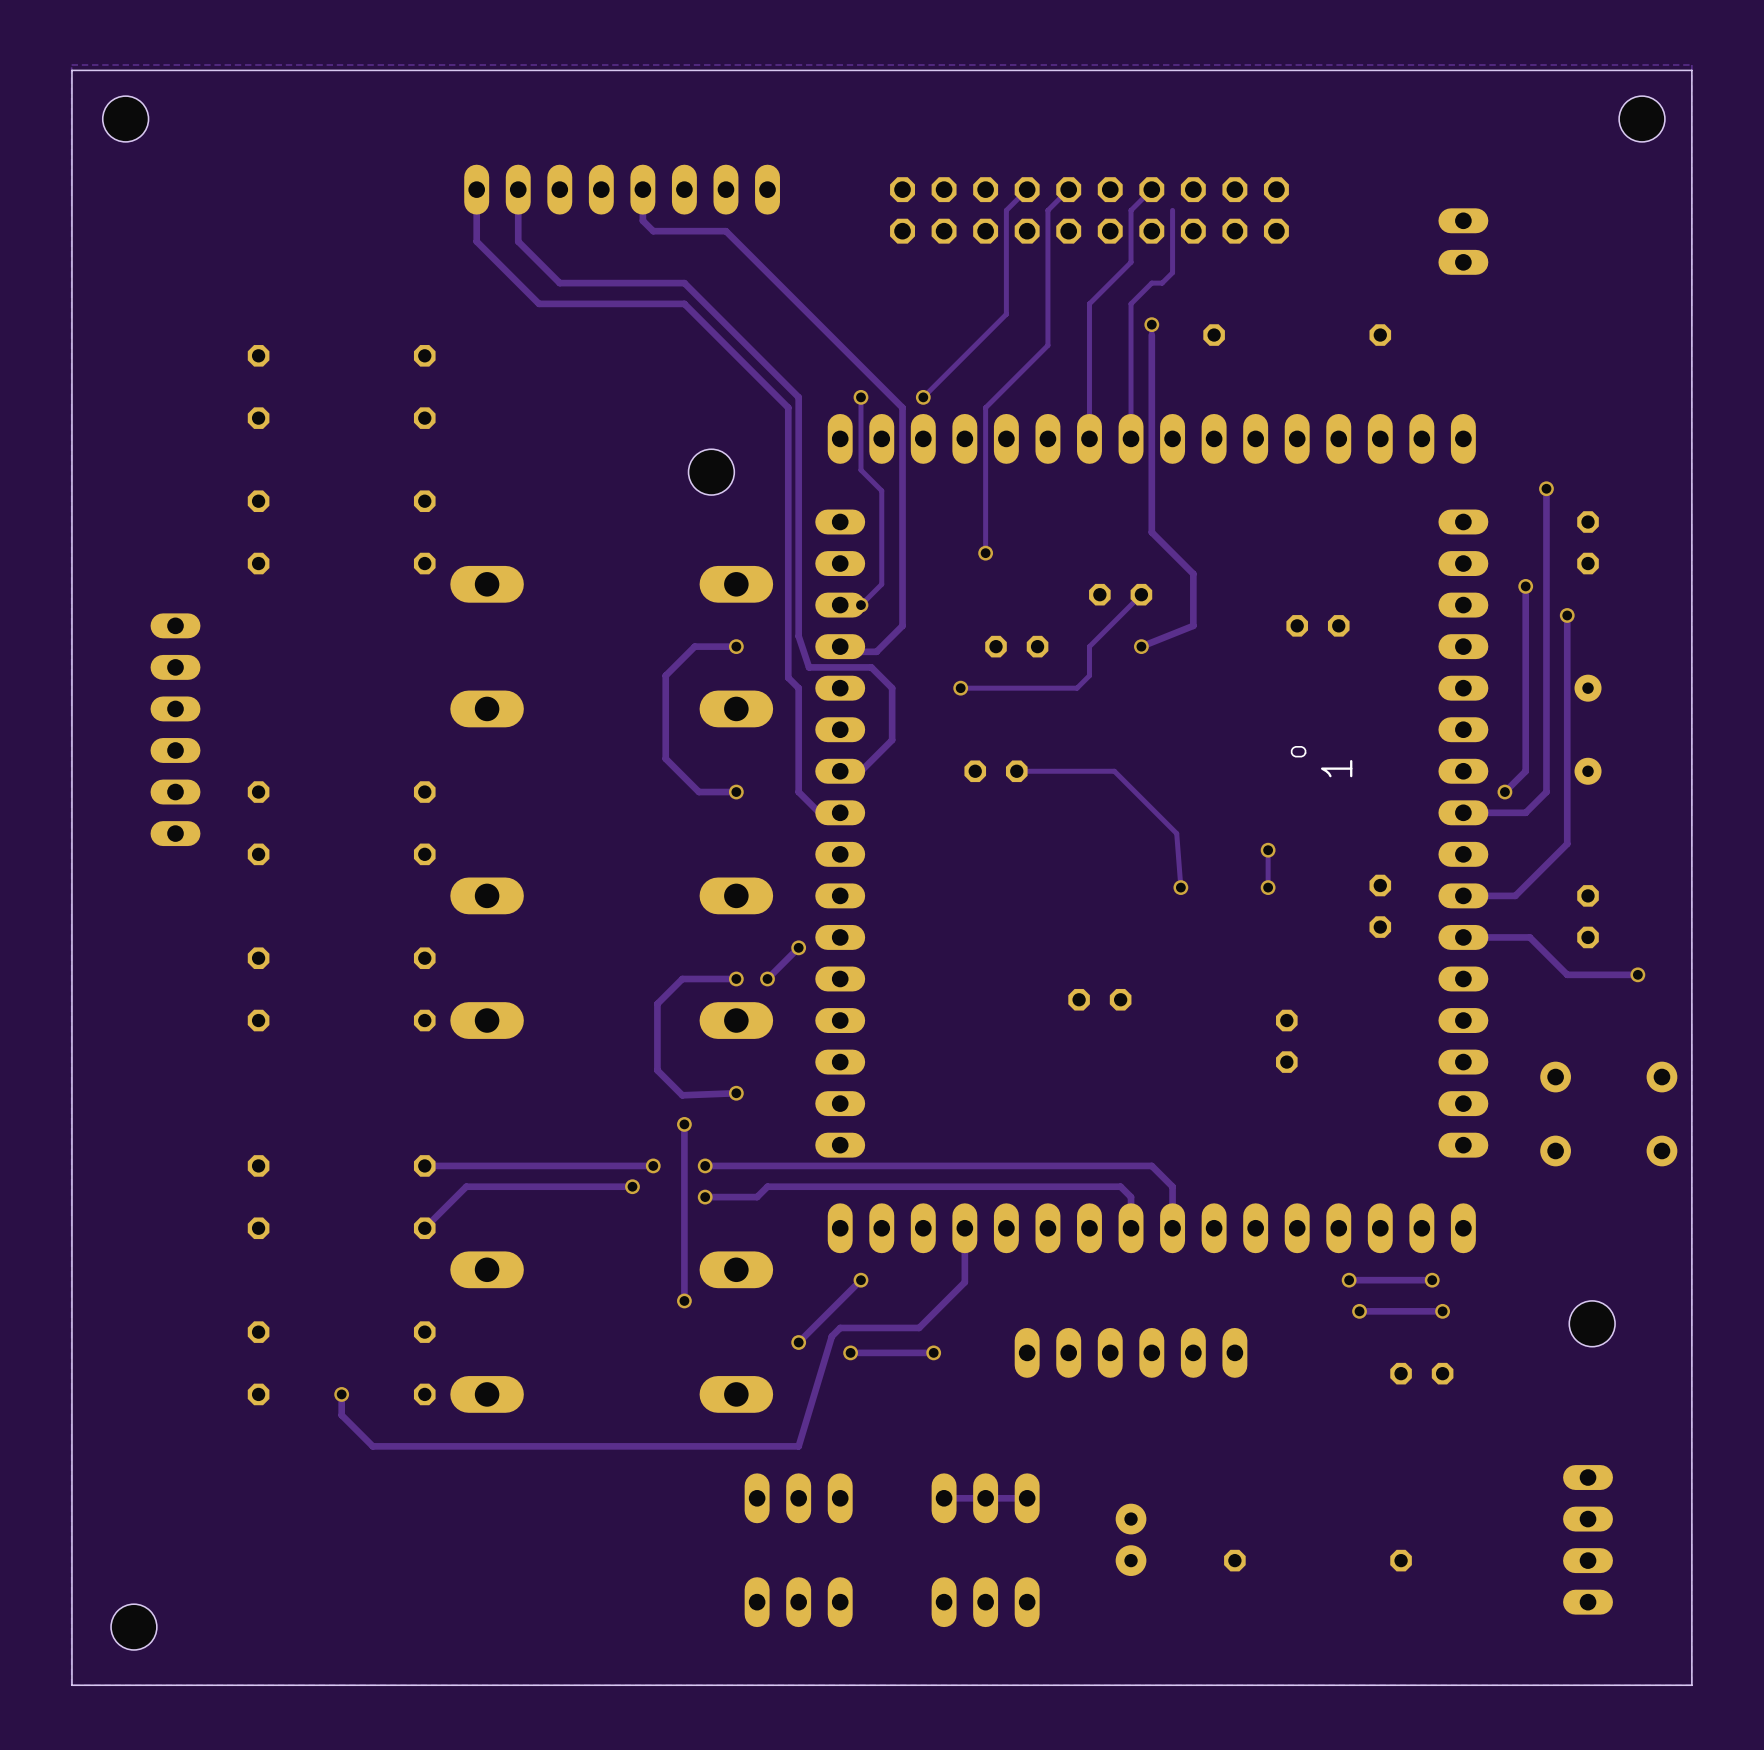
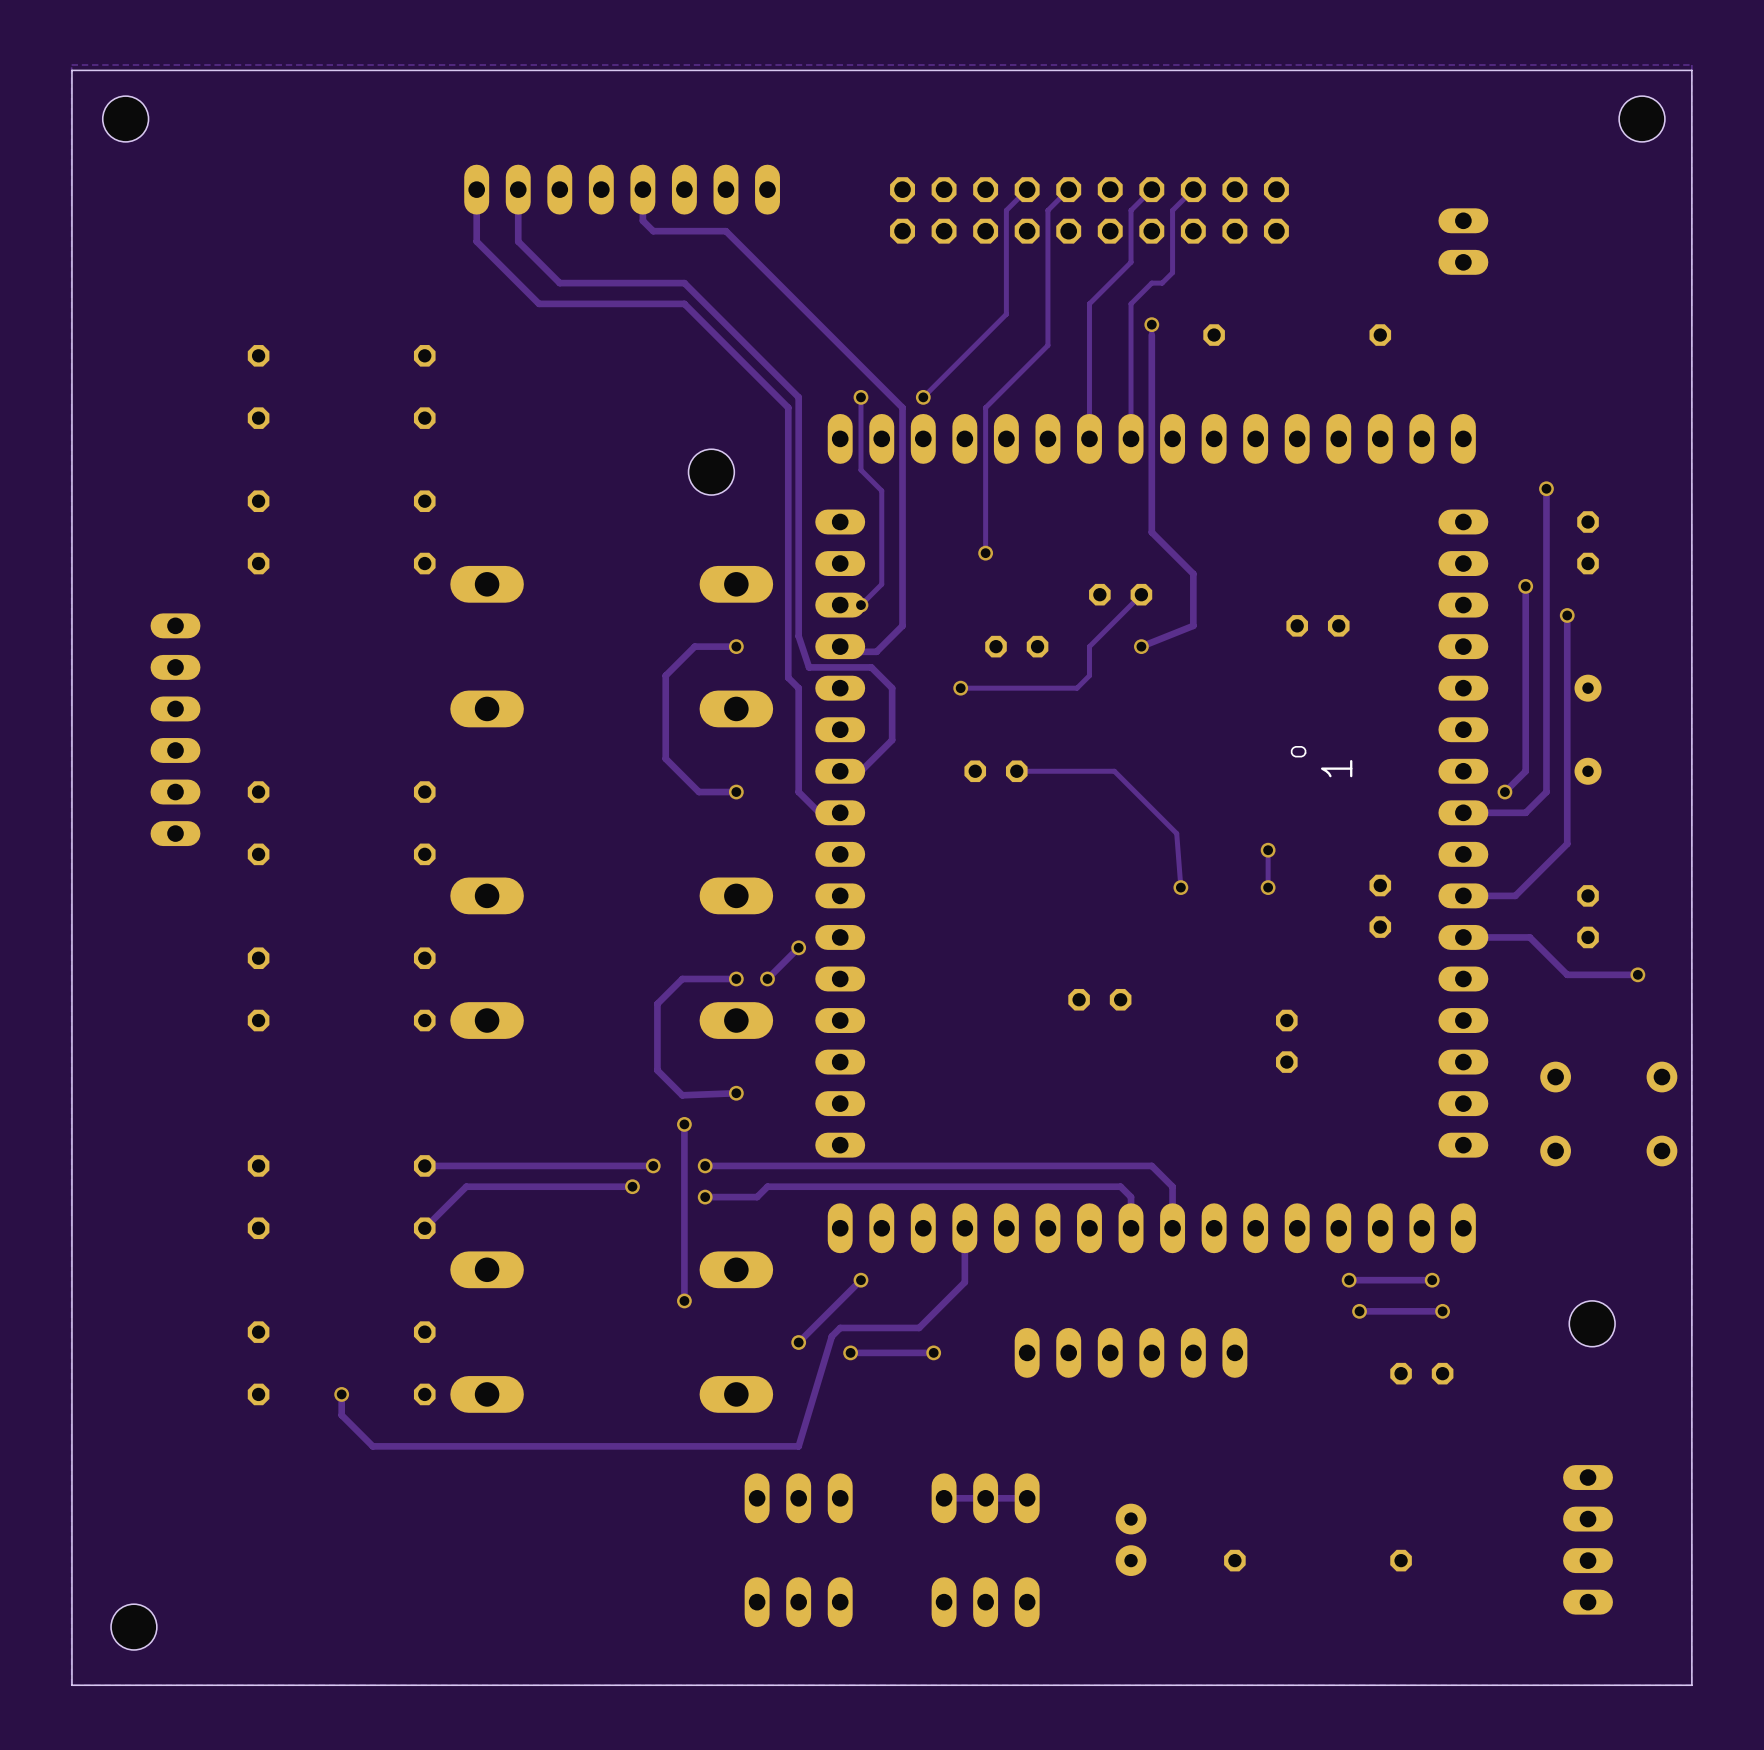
track: none -> (1193, 189) (1172, 210)

